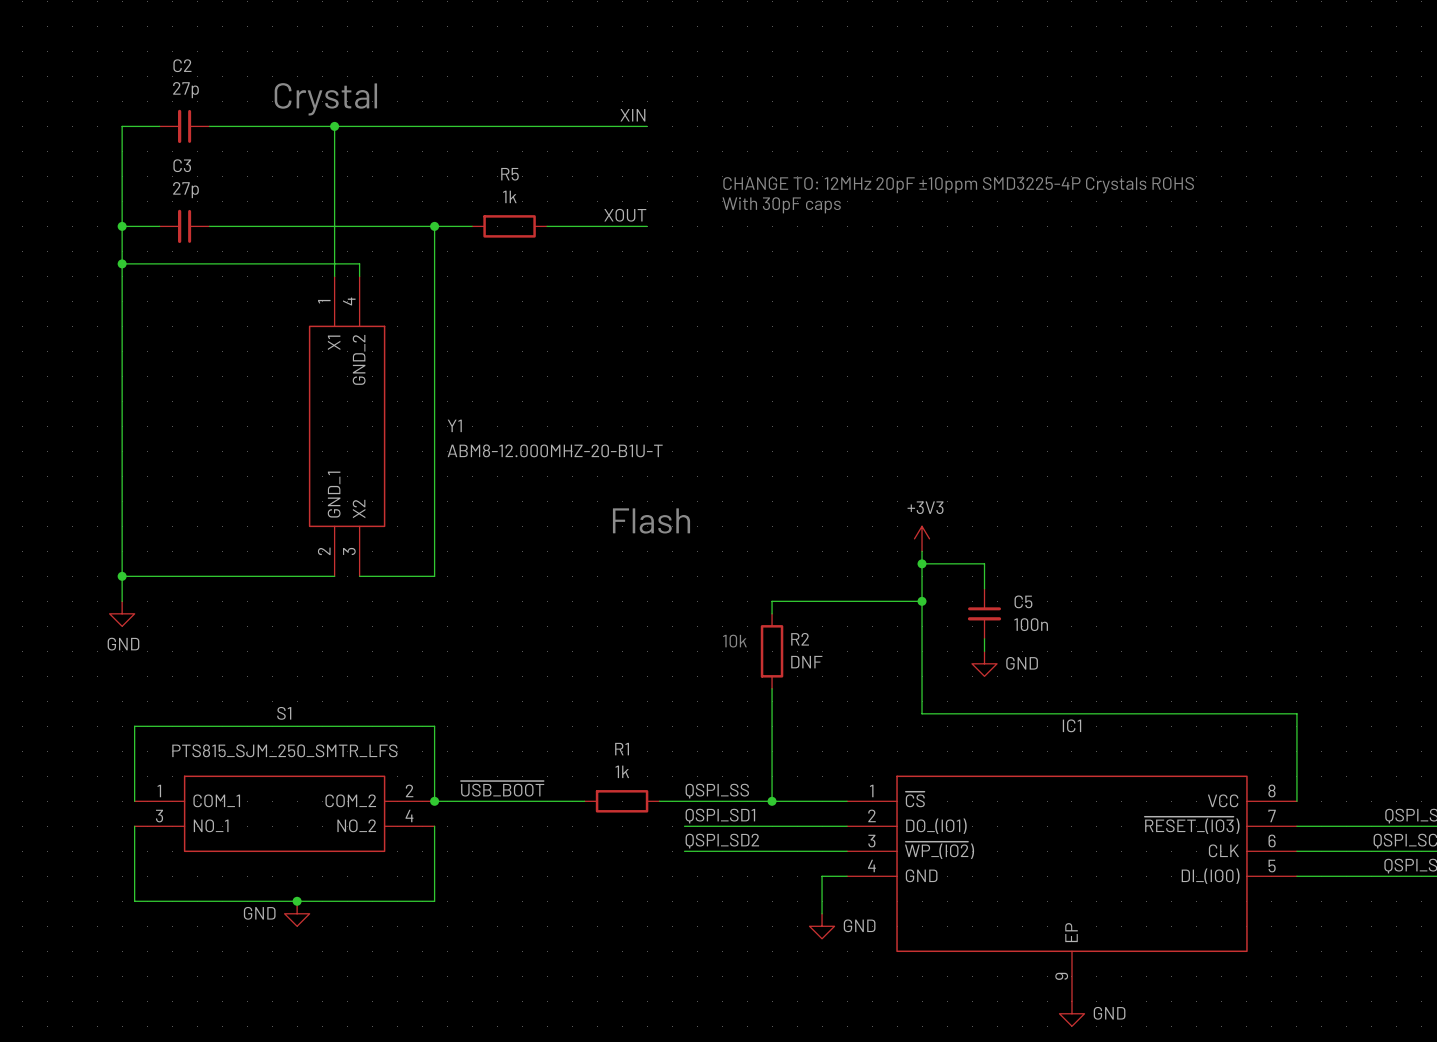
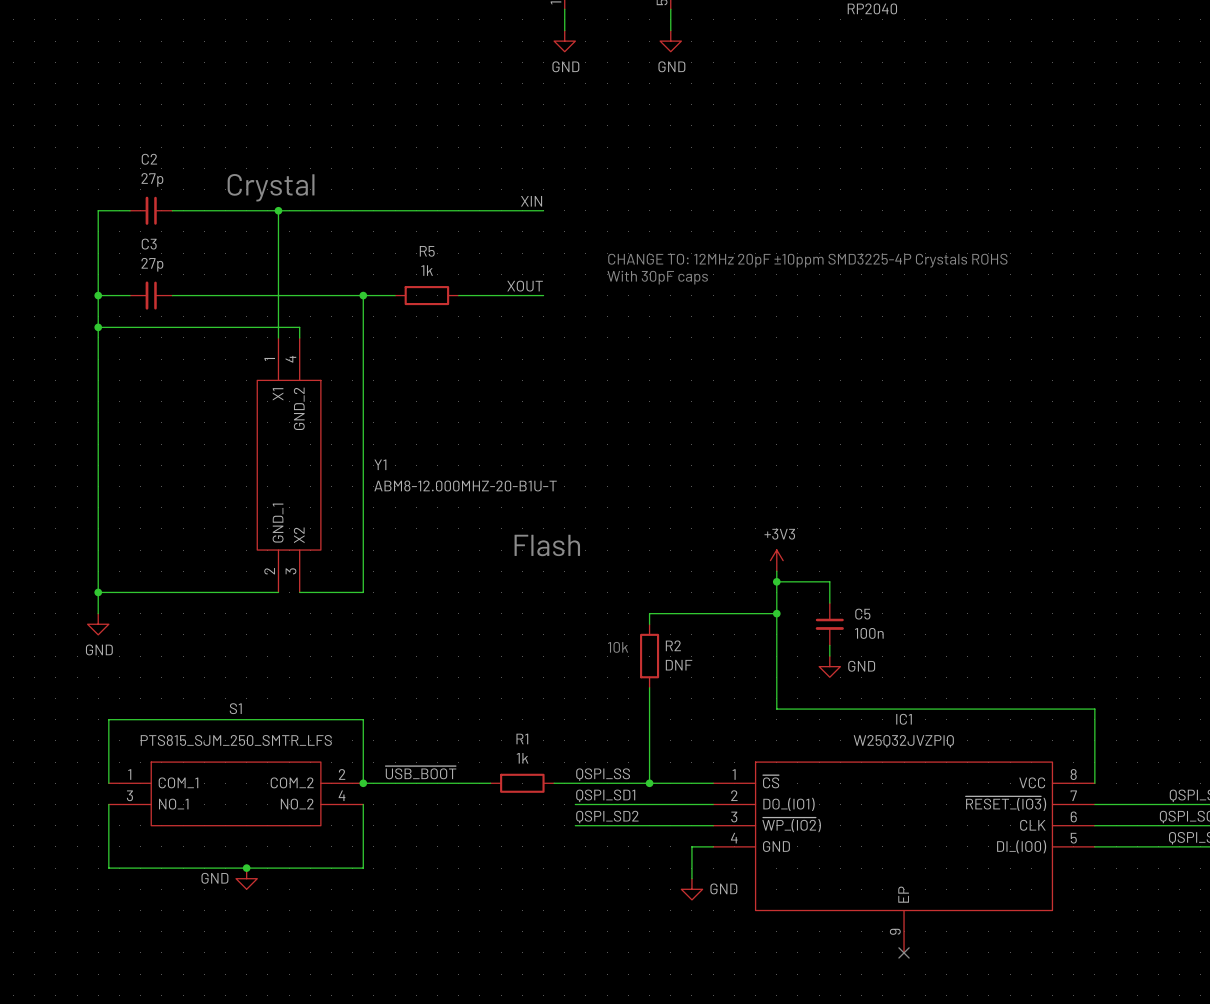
IC1 value: none -> W25Q32JVZPIQ (903, 741)
no-connect mark: none -> (904, 952)
power symbol: GND (1071, 1013) -> none

